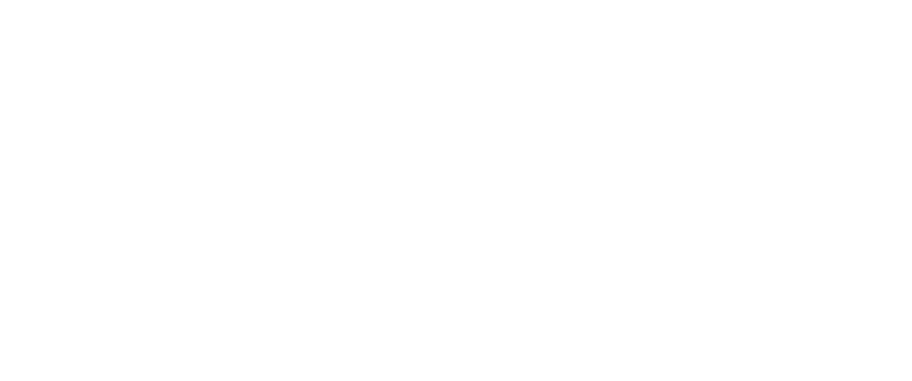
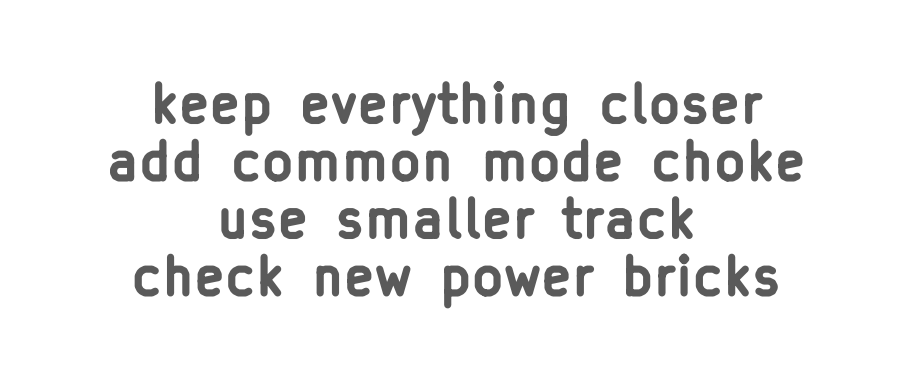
text: none -> keep everything closer (458, 108)
text: none -> add common mode choke (456, 160)
text: none -> use smaller track (457, 217)
text: none -> check new power bricks (456, 281)

